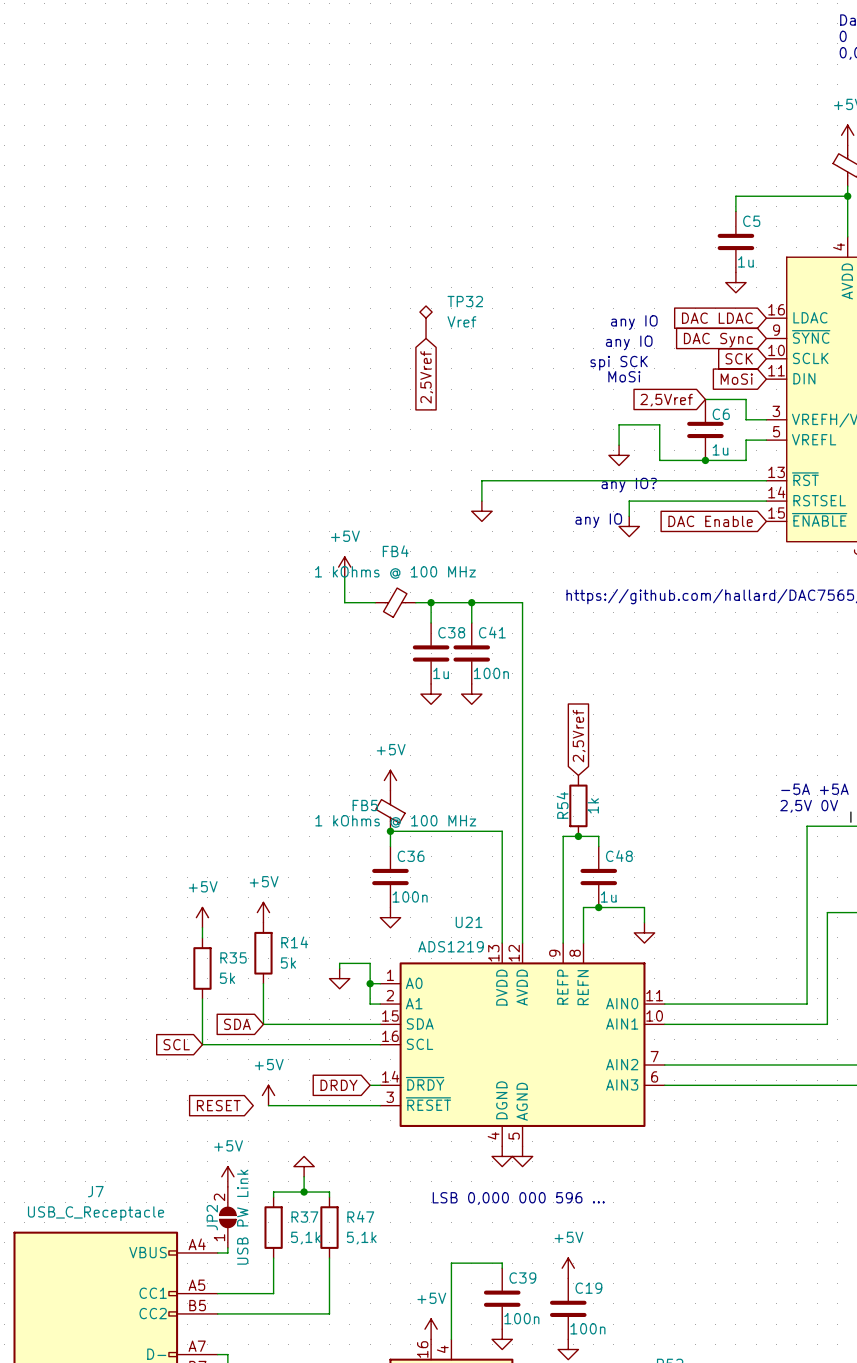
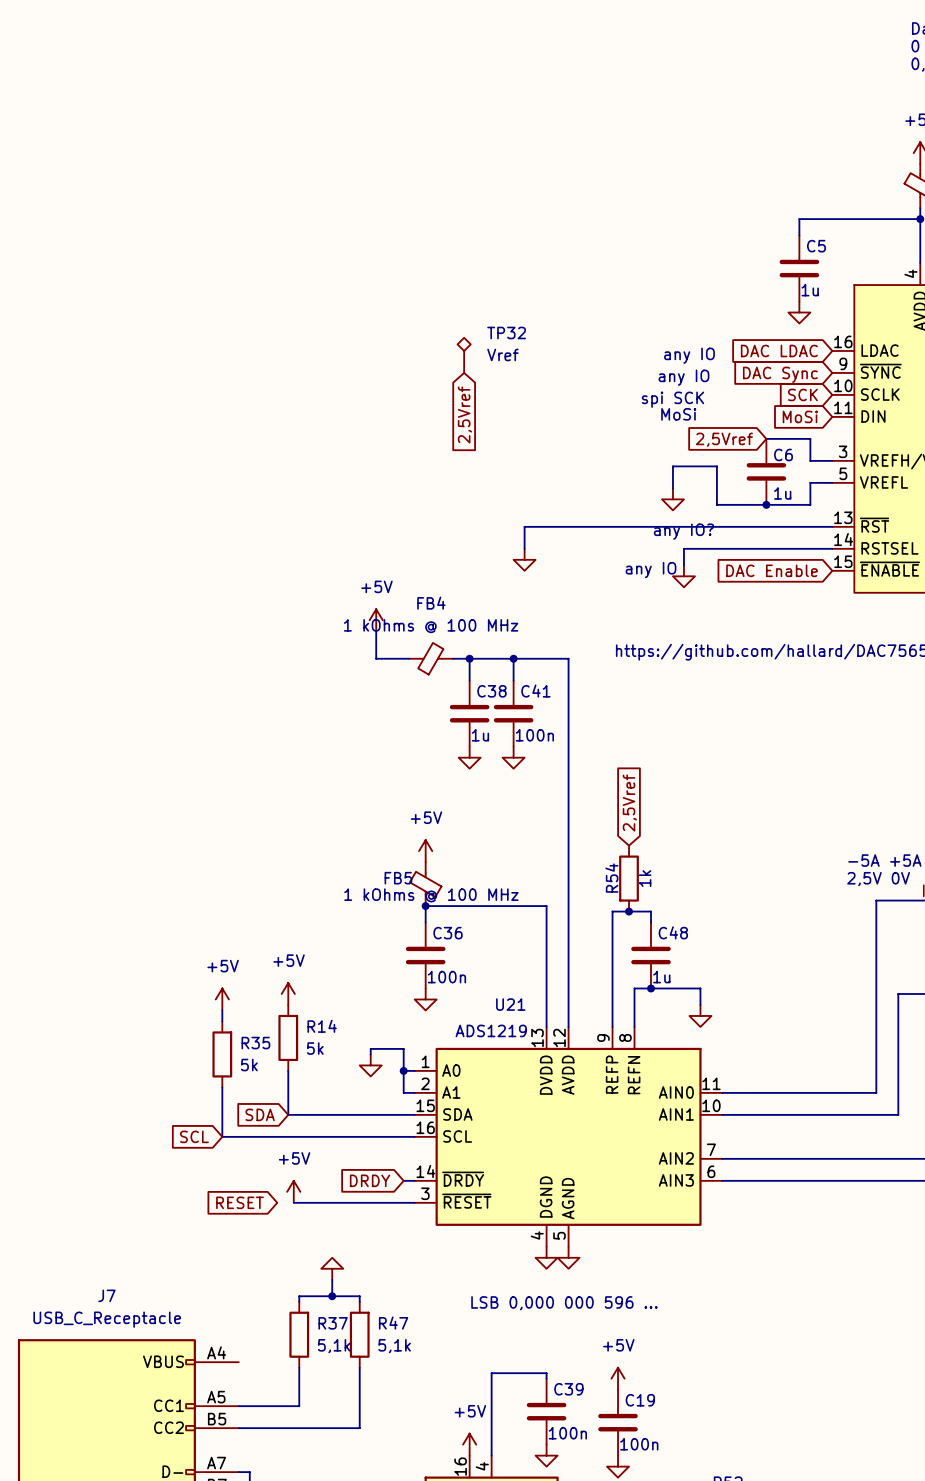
power symbol: +5V (227, 1176) -> none
JP2: USB PW Link (227, 1217) -> none
wire: (227, 1247) (227, 1252) (217, 1252) -> none

